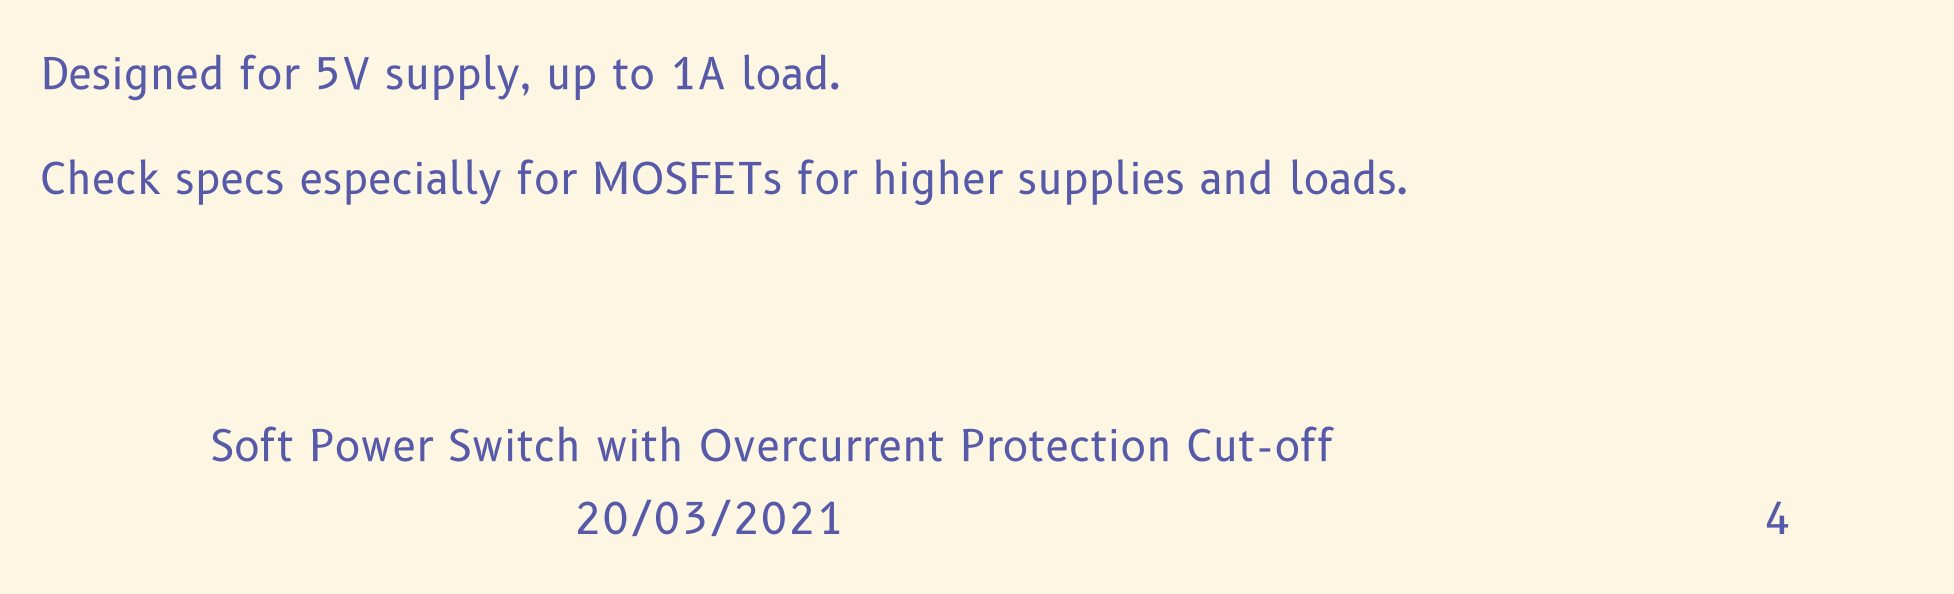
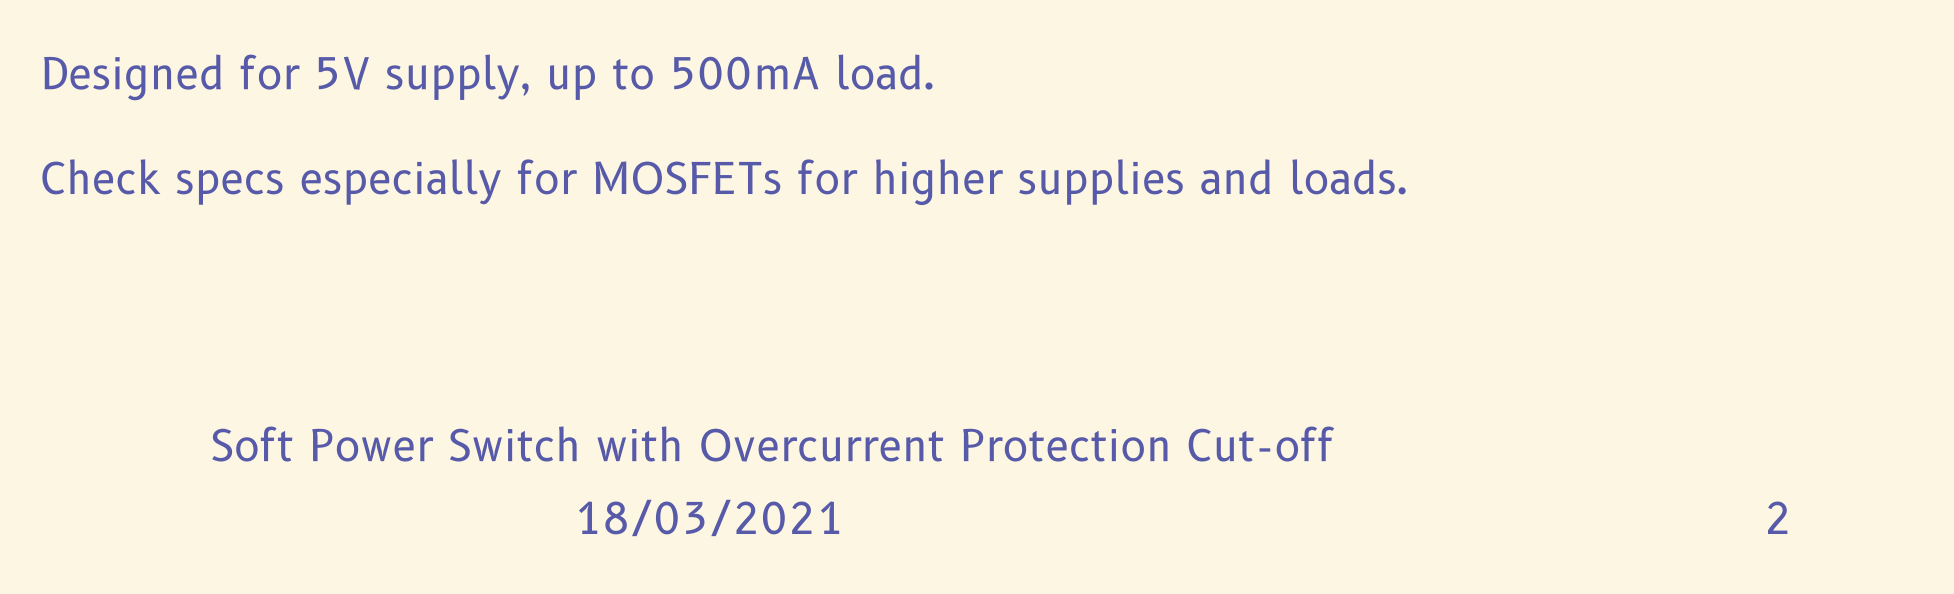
text: Designed for 5V supply, up to 1A load. (441, 77) -> Designed for 5V supply, up to 500mA load. (488, 77)
text: 20/03/2021 (708, 517) -> 18/03/2021 (709, 517)
text: 4 (1777, 517) -> 2 (1777, 517)

